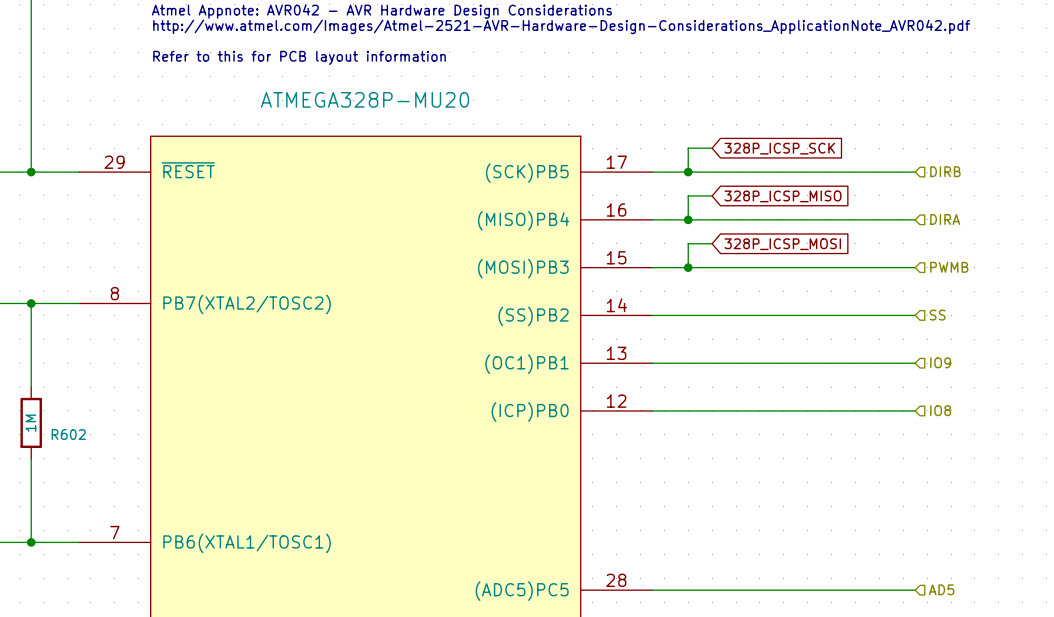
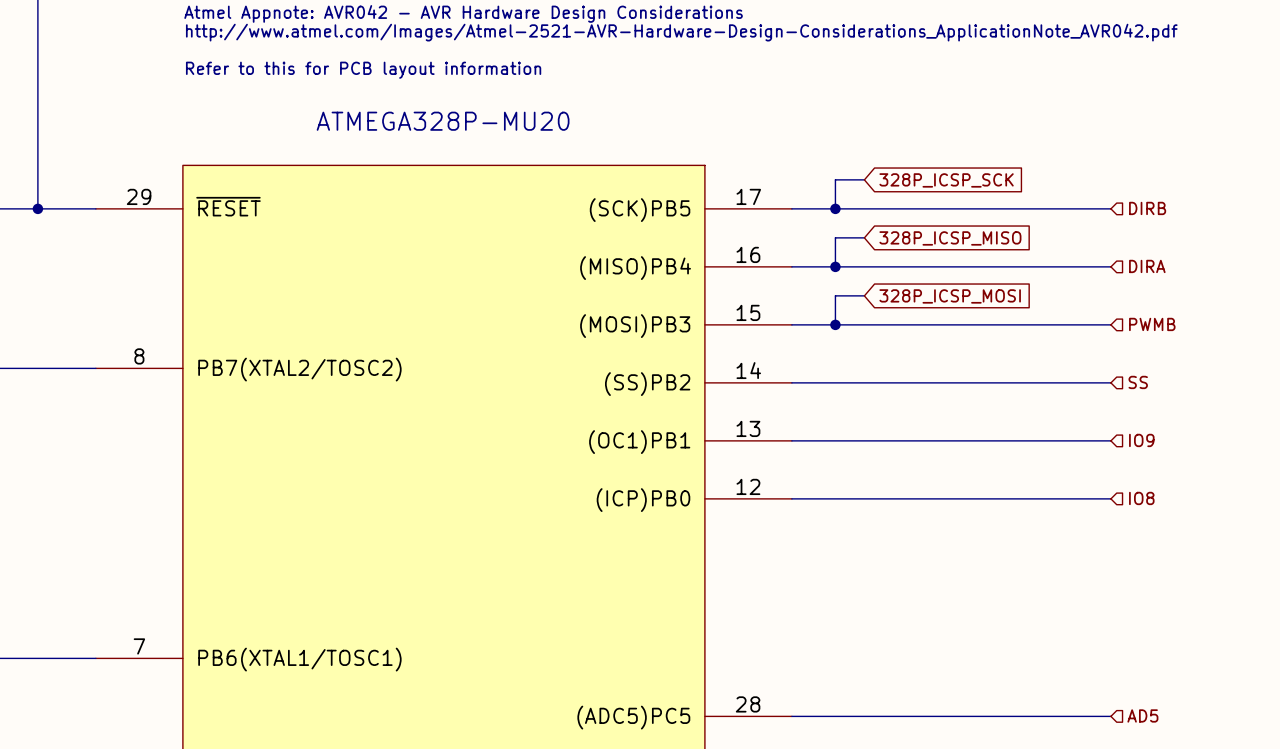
wire: (31, 303) (31, 387) -> none
junction: (31, 303) -> none
R602: 1M (31, 422) -> none
wire: (31, 458) (31, 542) -> none
junction: (31, 542) -> none

